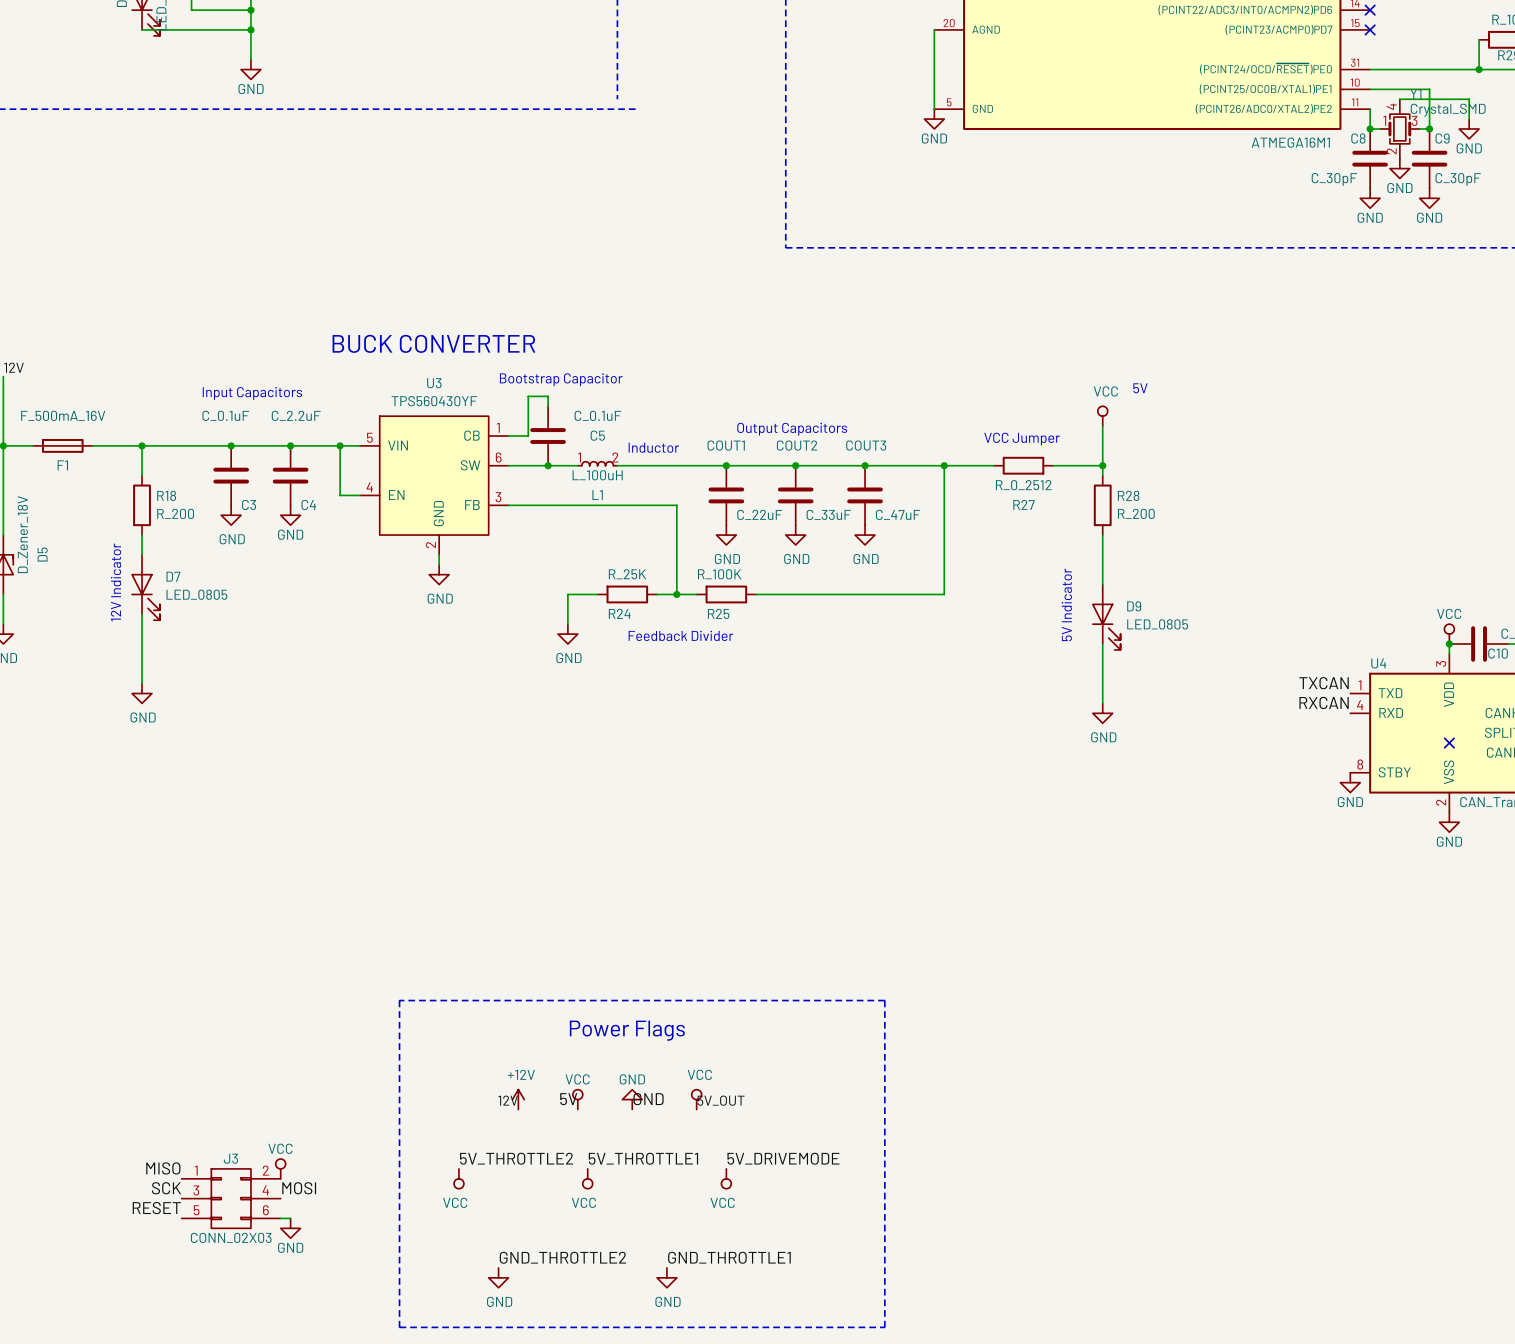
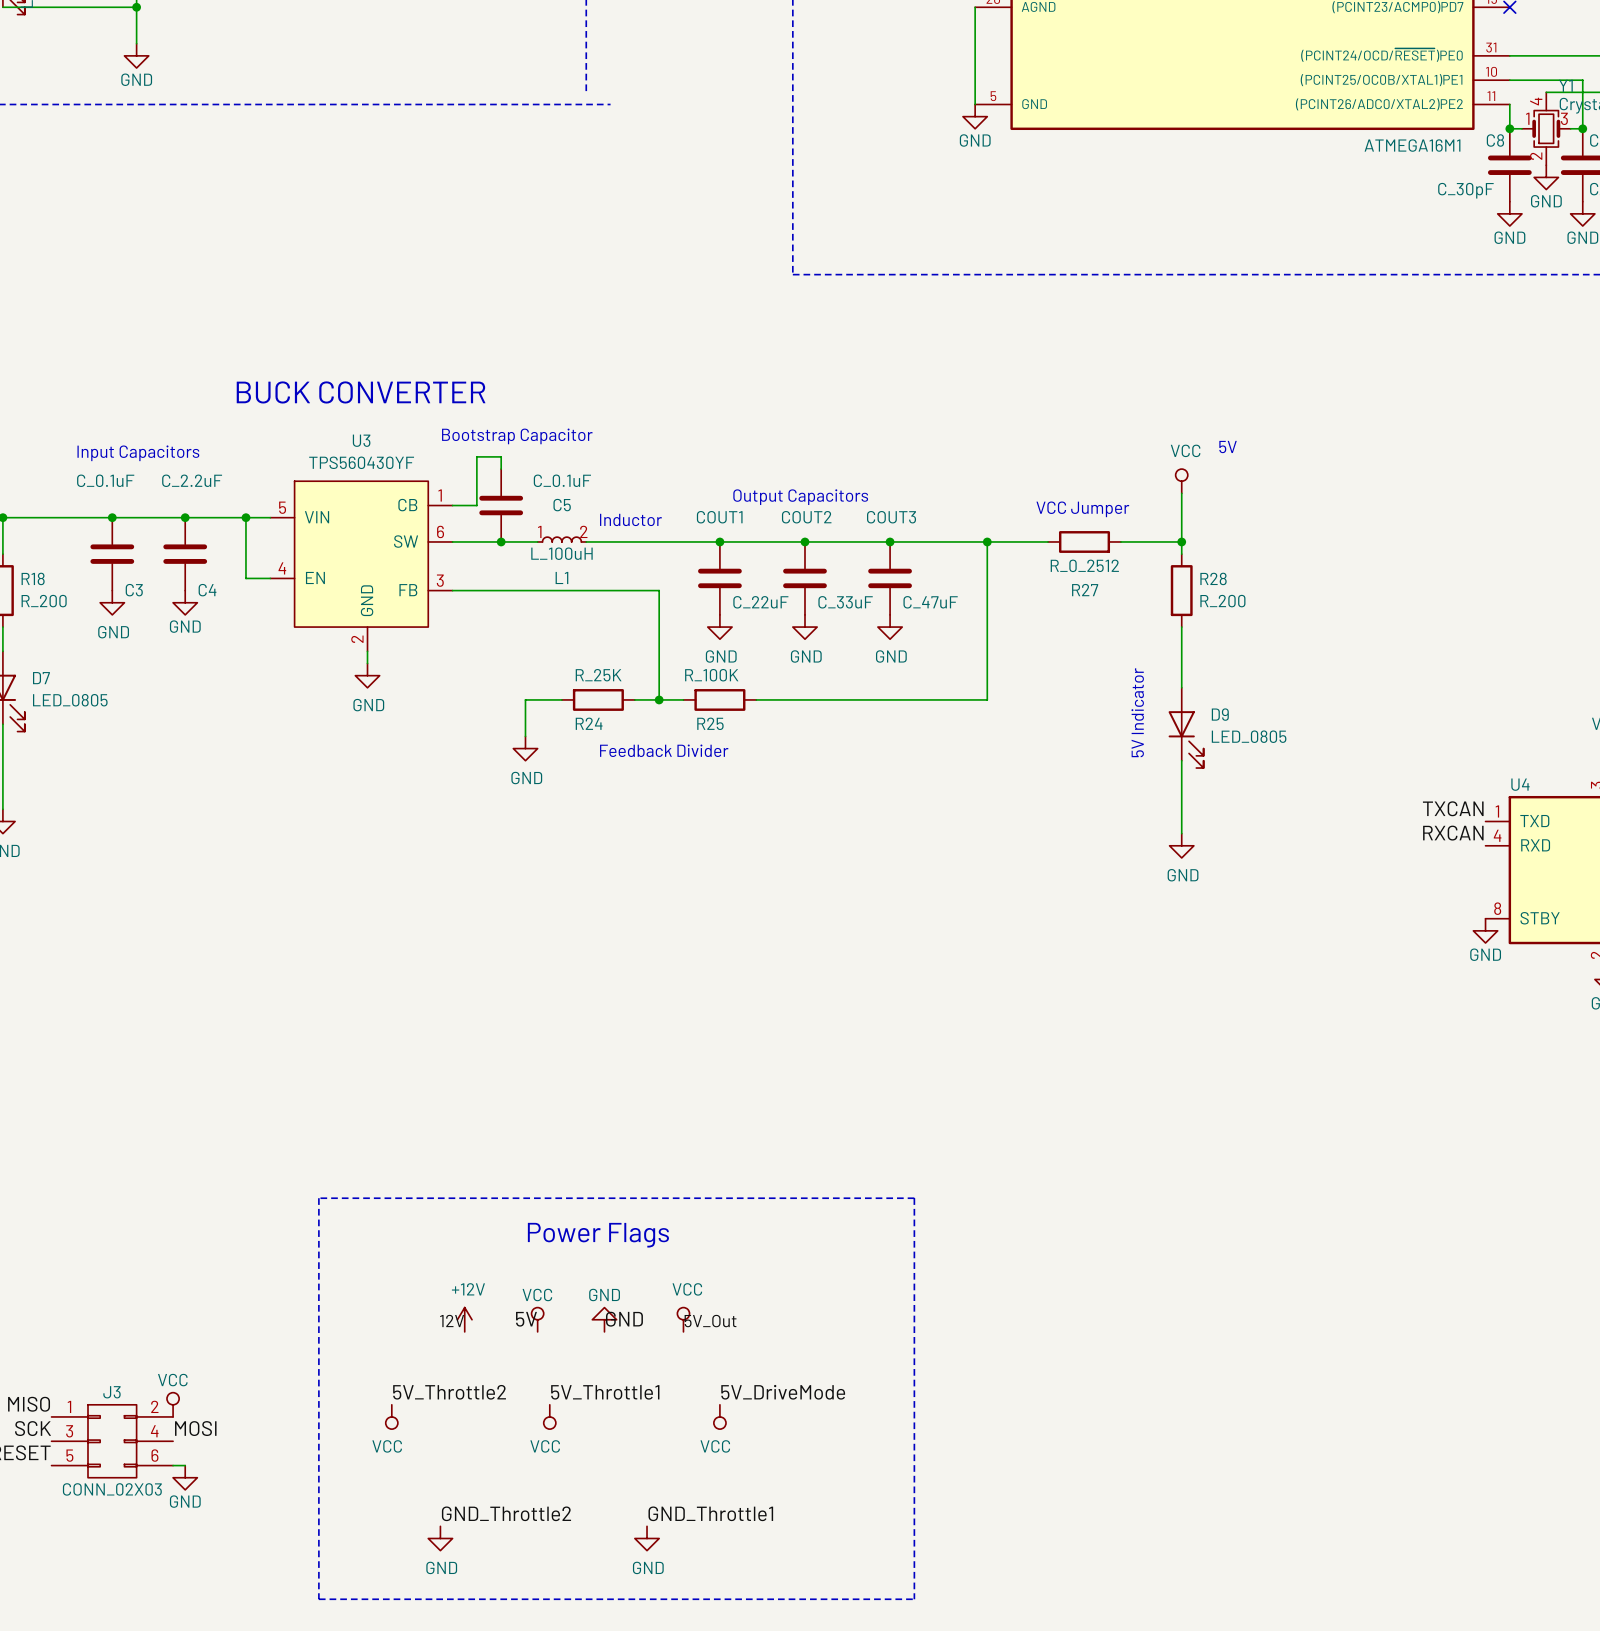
label: 5V_OUT (721, 1100) -> 5V_Out (710, 1321)
label: 5V_THROTTLE2 (516, 1158) -> 5V_Throttle2 (449, 1392)
label: 5V_THROTTLE1 (643, 1158) -> 5V_Throttle1 (605, 1392)
label: 5V_DRIVEMODE (783, 1158) -> 5V_DriveMode (783, 1392)
label: GND_THROTTLE2 (562, 1257) -> GND_Throttle2 (506, 1513)
label: GND_THROTTLE1 (729, 1257) -> GND_Throttle1 (710, 1513)

